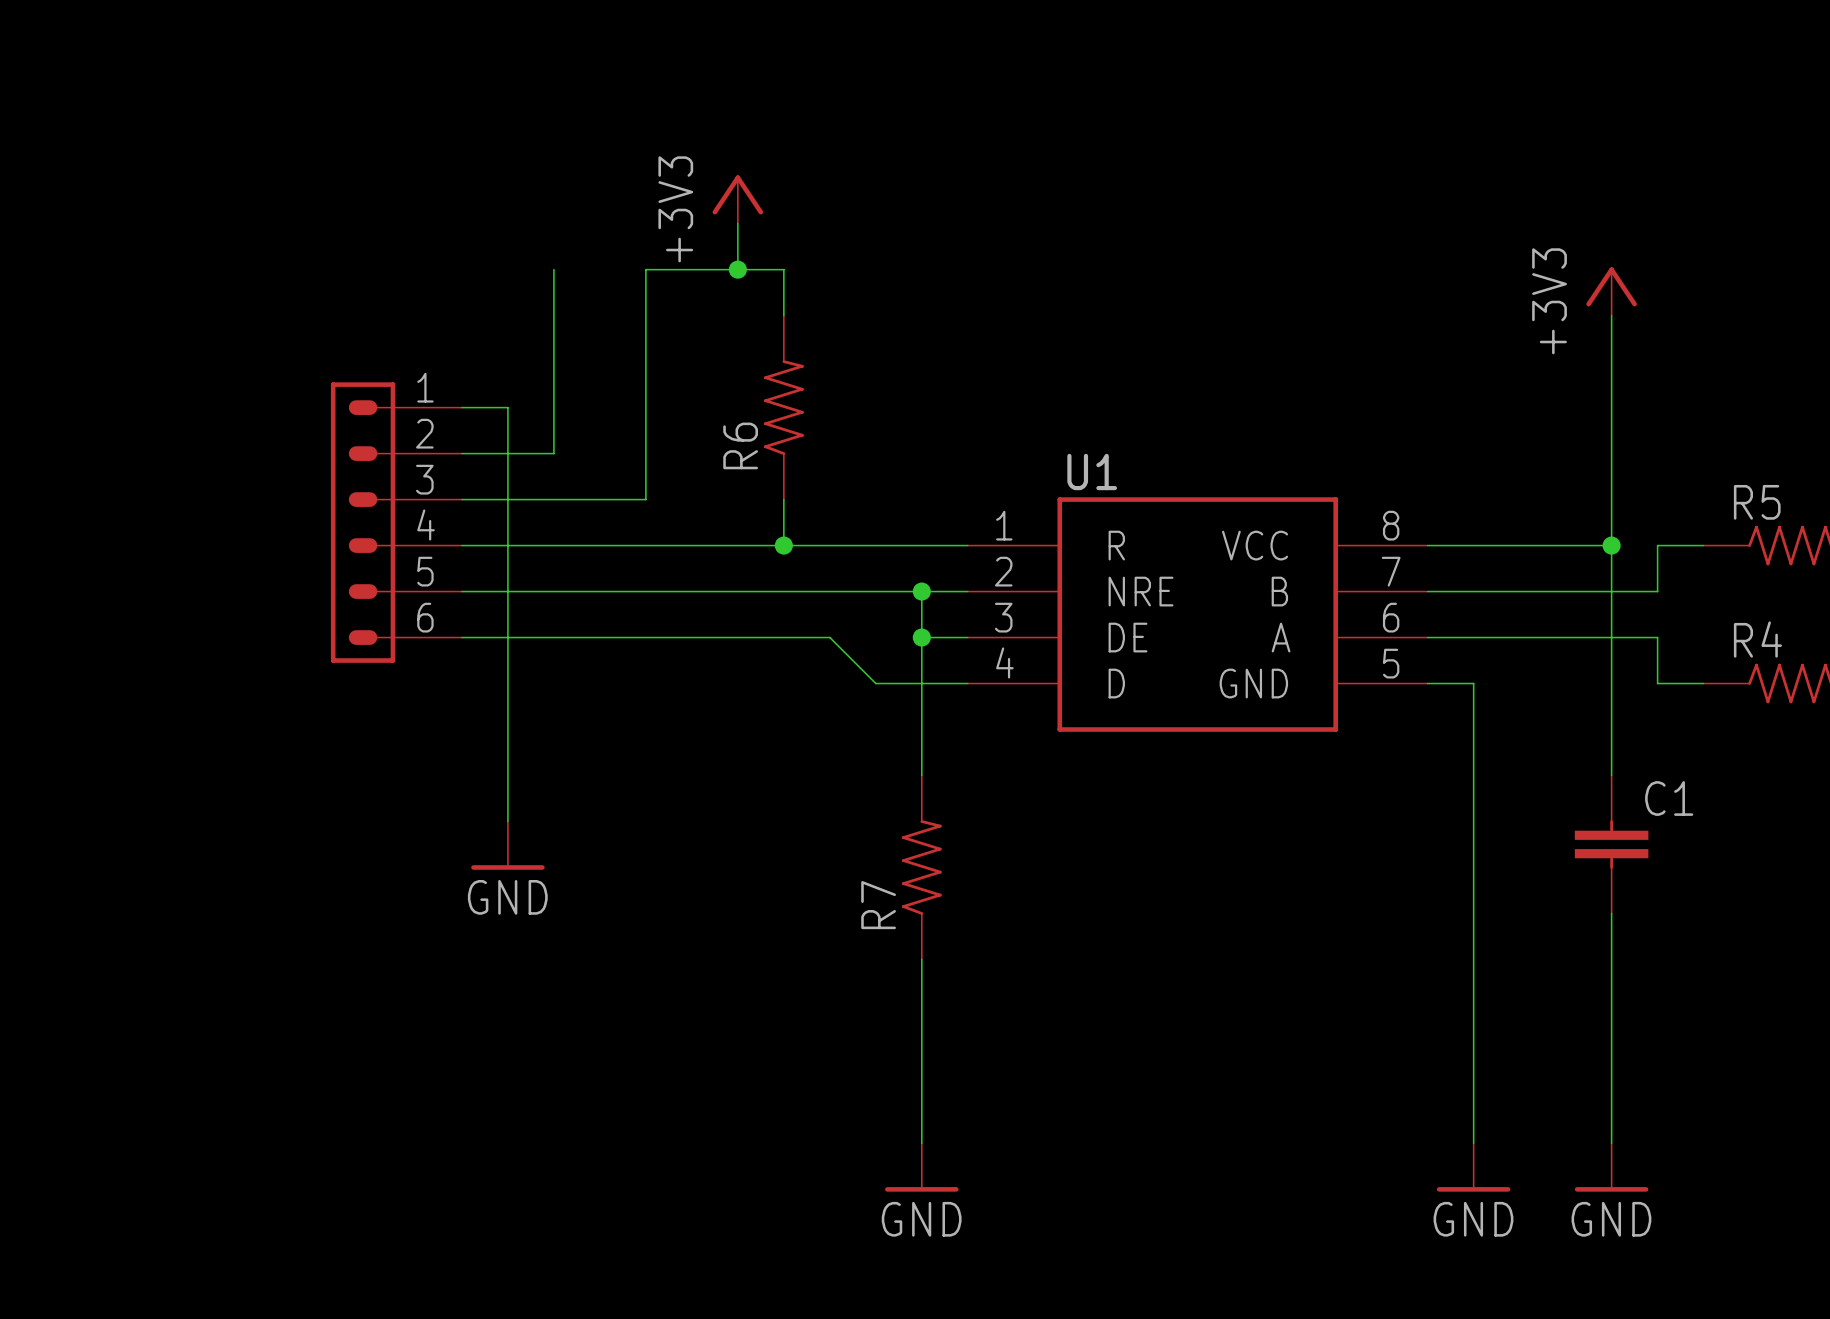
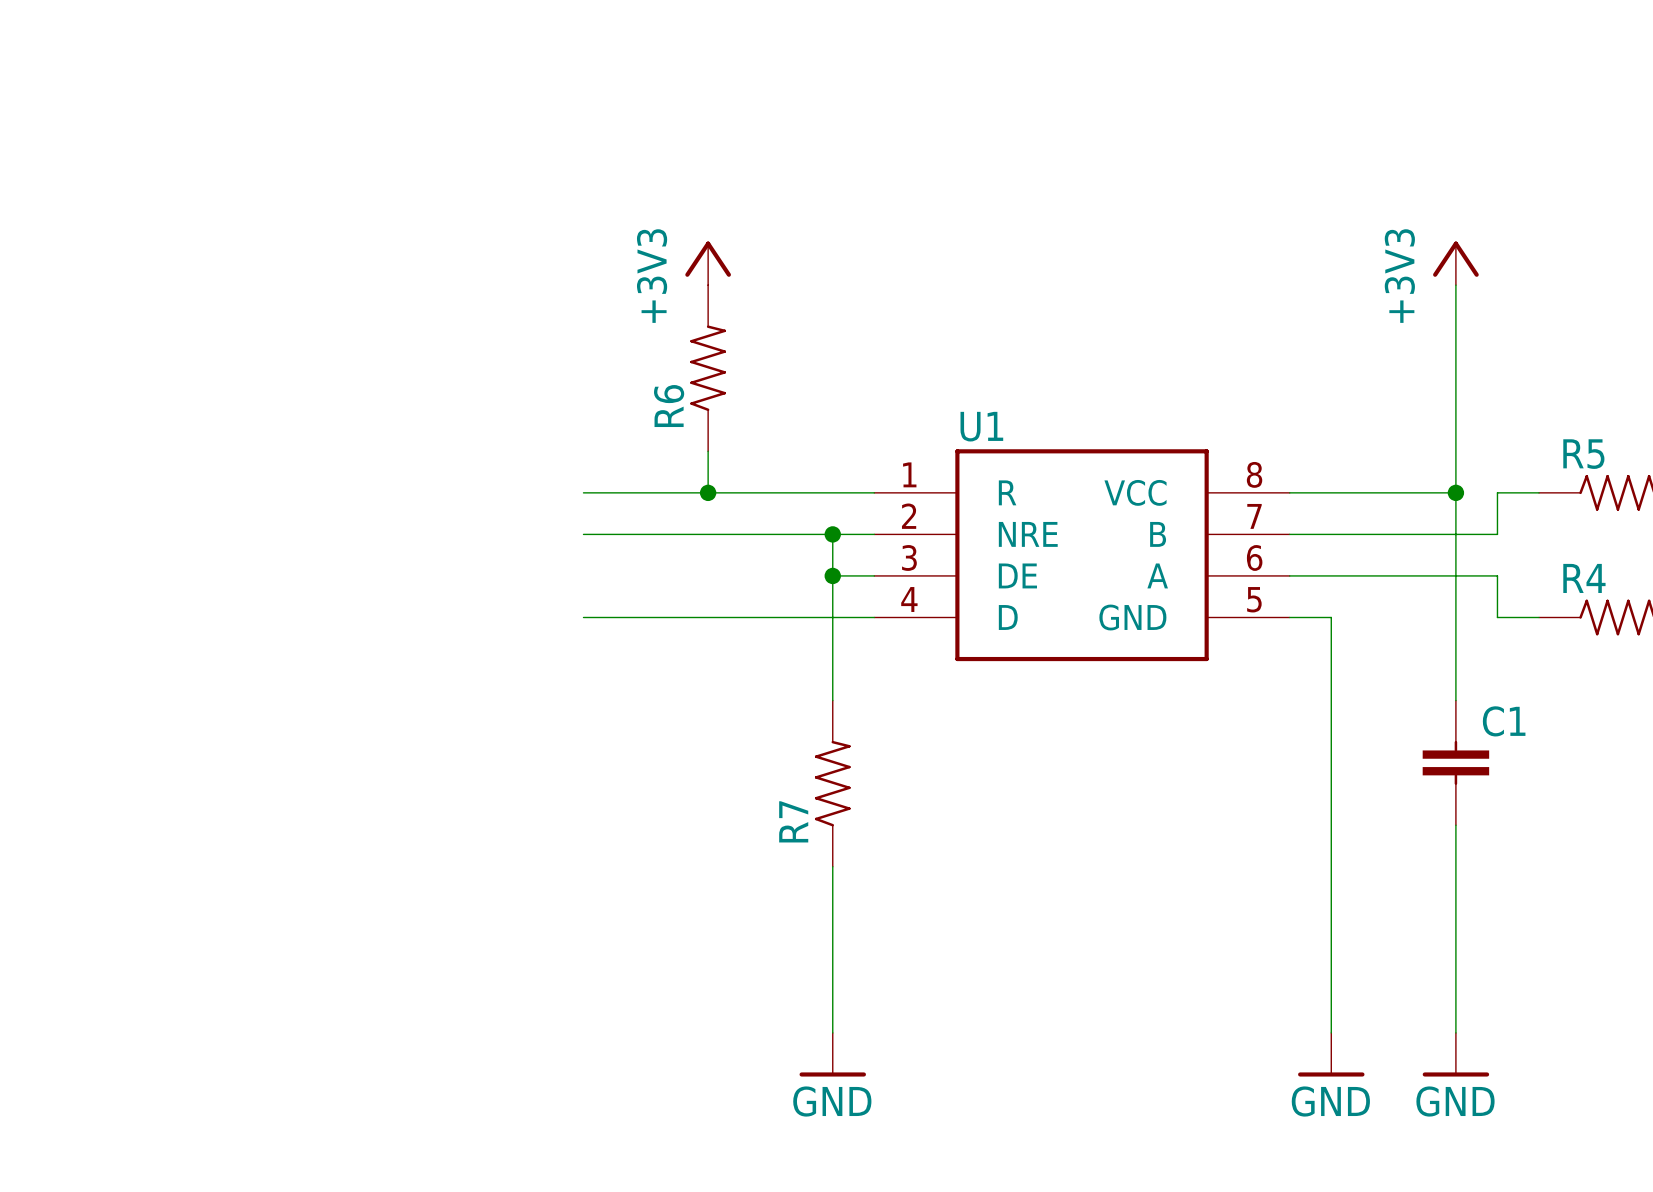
power symbol position: +3V3 (737, 199) -> +3V3 (708, 263)
wire: (737, 223) (737, 269) -> none
wire: (553, 269) (553, 453) (461, 453) -> none
junction: (737, 269) -> none
wire: (783, 315) (783, 269) (645, 269) (645, 499) (461, 499) -> none
wire: (461, 407) (507, 407) (507, 821) -> none
part: (396, 522) -> none
wire: (461, 545) (645, 545) -> none
wire: (461, 591) (645, 591) -> none
wire: (461, 637) (829, 637) (875, 683) -> (583, 617) (791, 617)
power symbol: GND (507, 845) -> none

